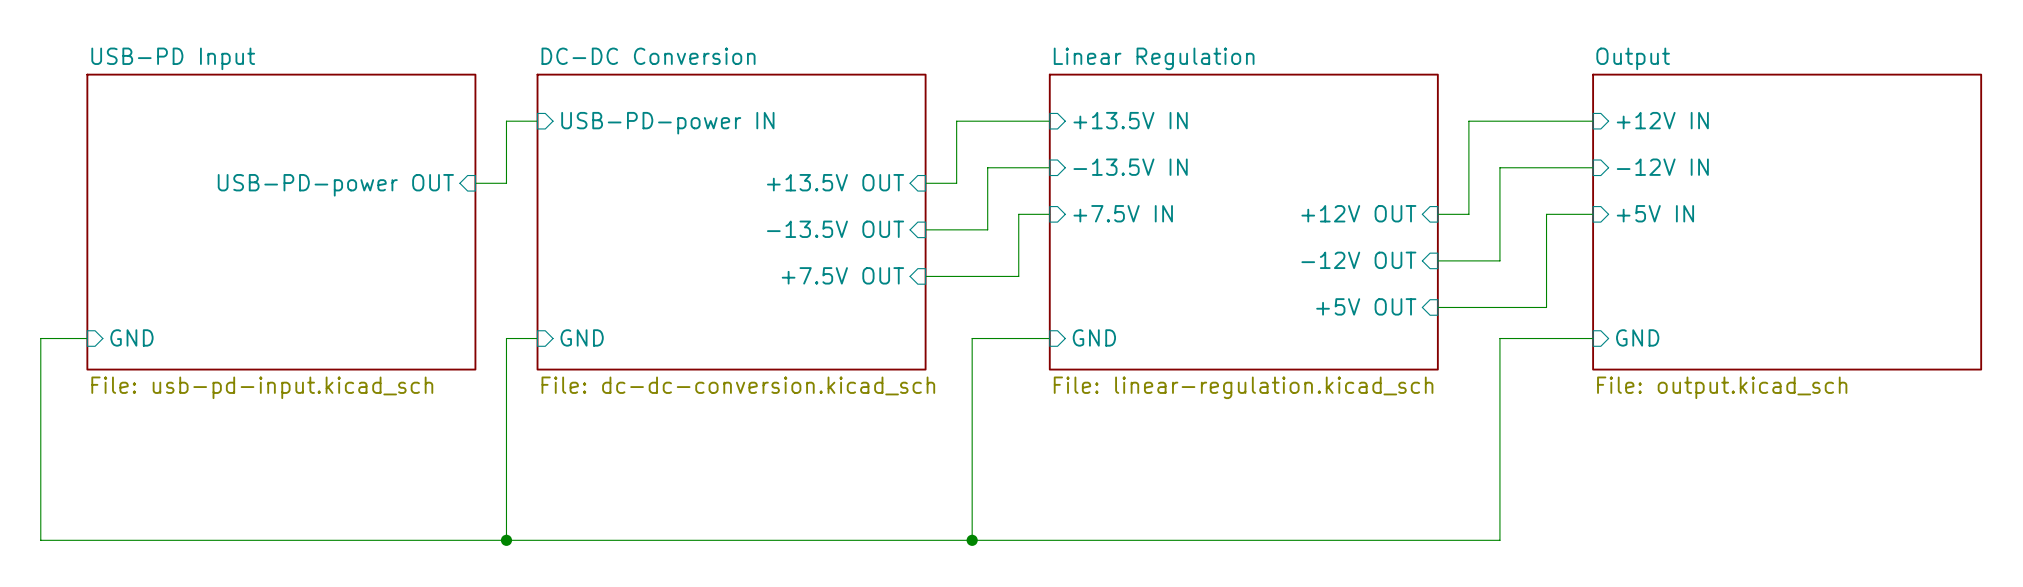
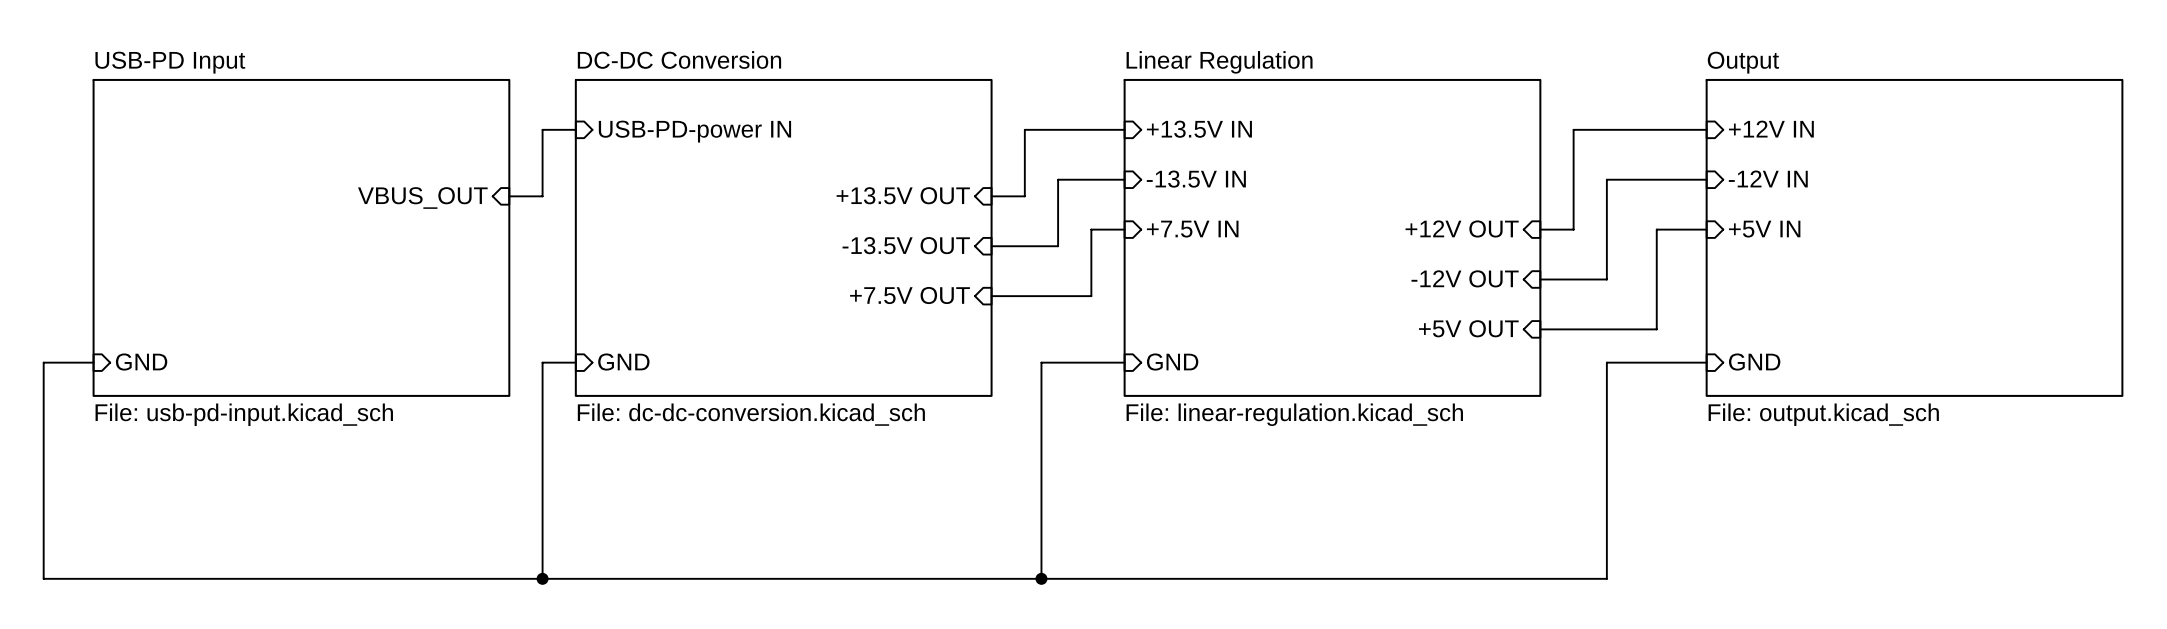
sheet pin: USB-PD-power OUT (335, 185) -> VBUS_OUT (422, 198)

